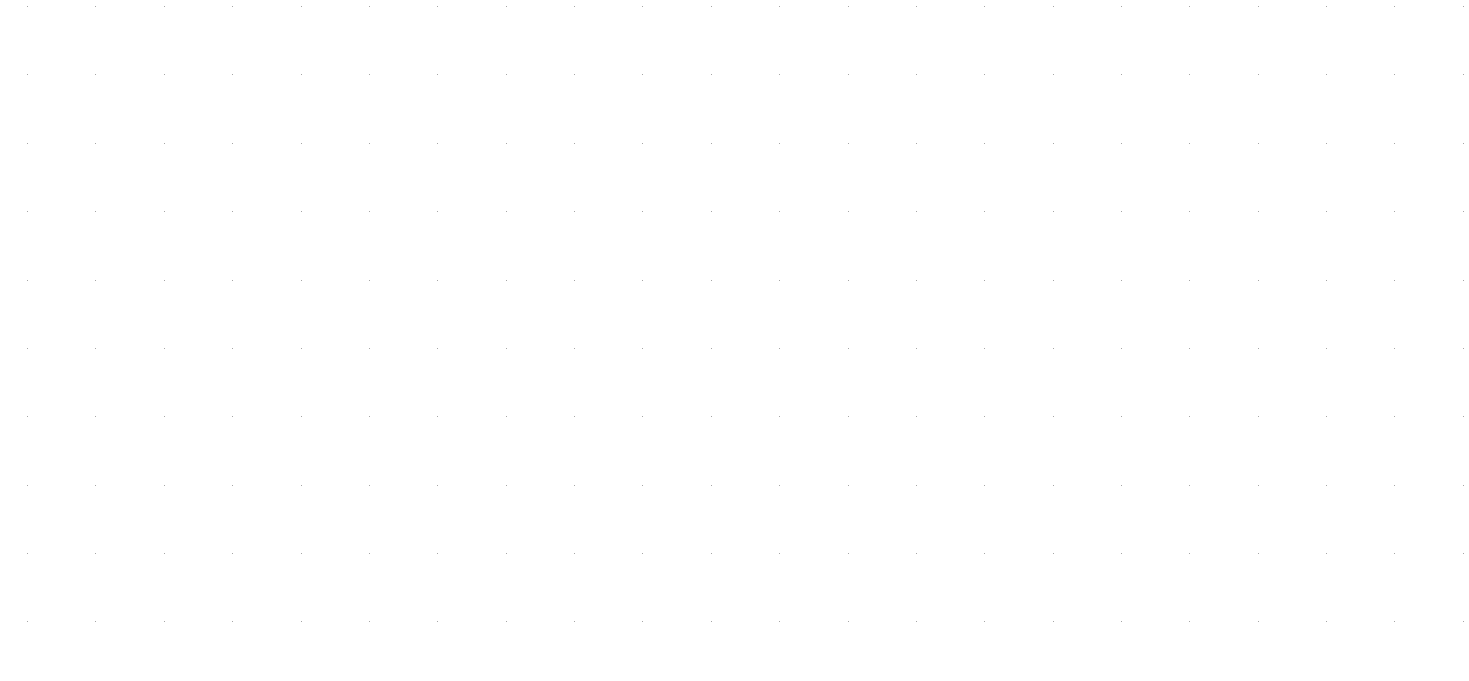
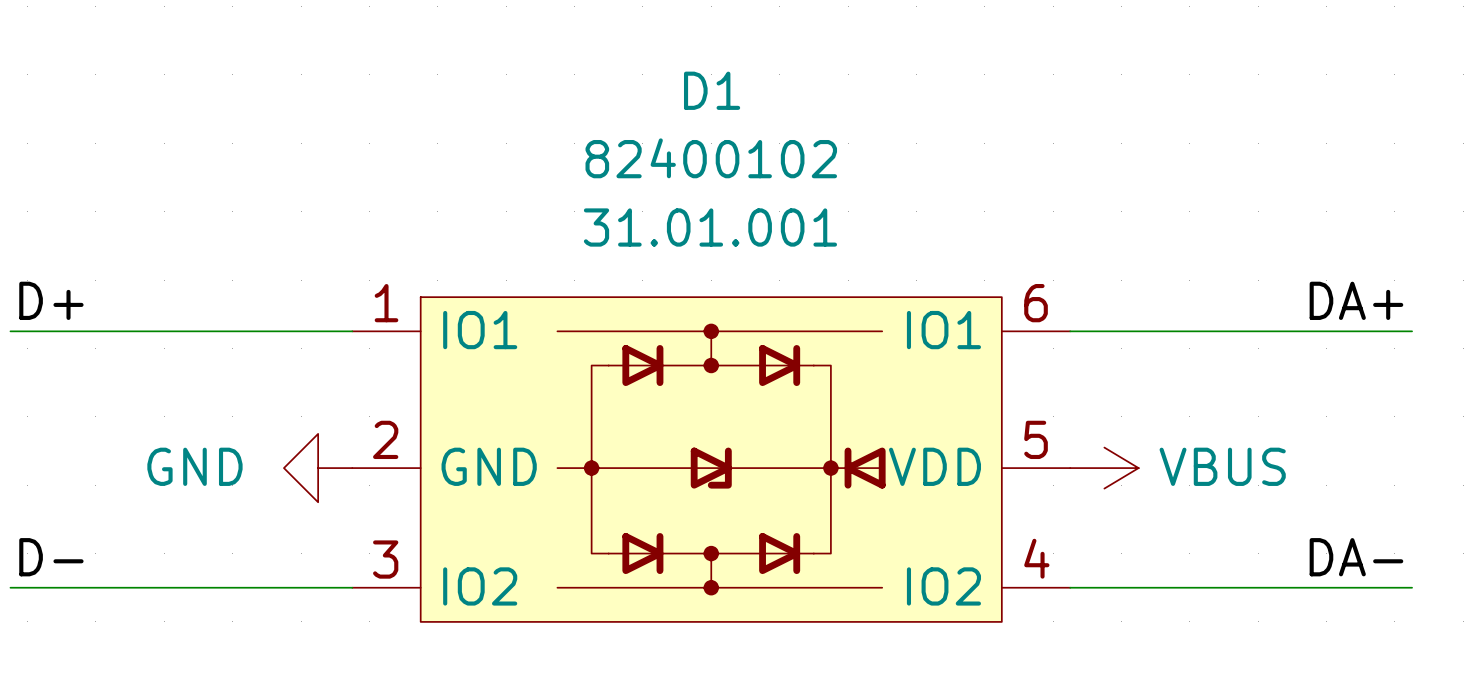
label: none -> D+ (51, 300)
label: none -> DA+ (1356, 300)
wire: none -> (10, 331) (352, 331)
wire: none -> (1070, 331) (1412, 331)
D1: none -> 82400102 (711, 459)
power symbol: none -> GND (318, 468)
power symbol: none -> VBUS (1104, 468)
label: none -> D- (51, 557)
label: none -> DA- (1356, 557)
wire: none -> (10, 587) (352, 587)
wire: none -> (1070, 587) (1412, 587)

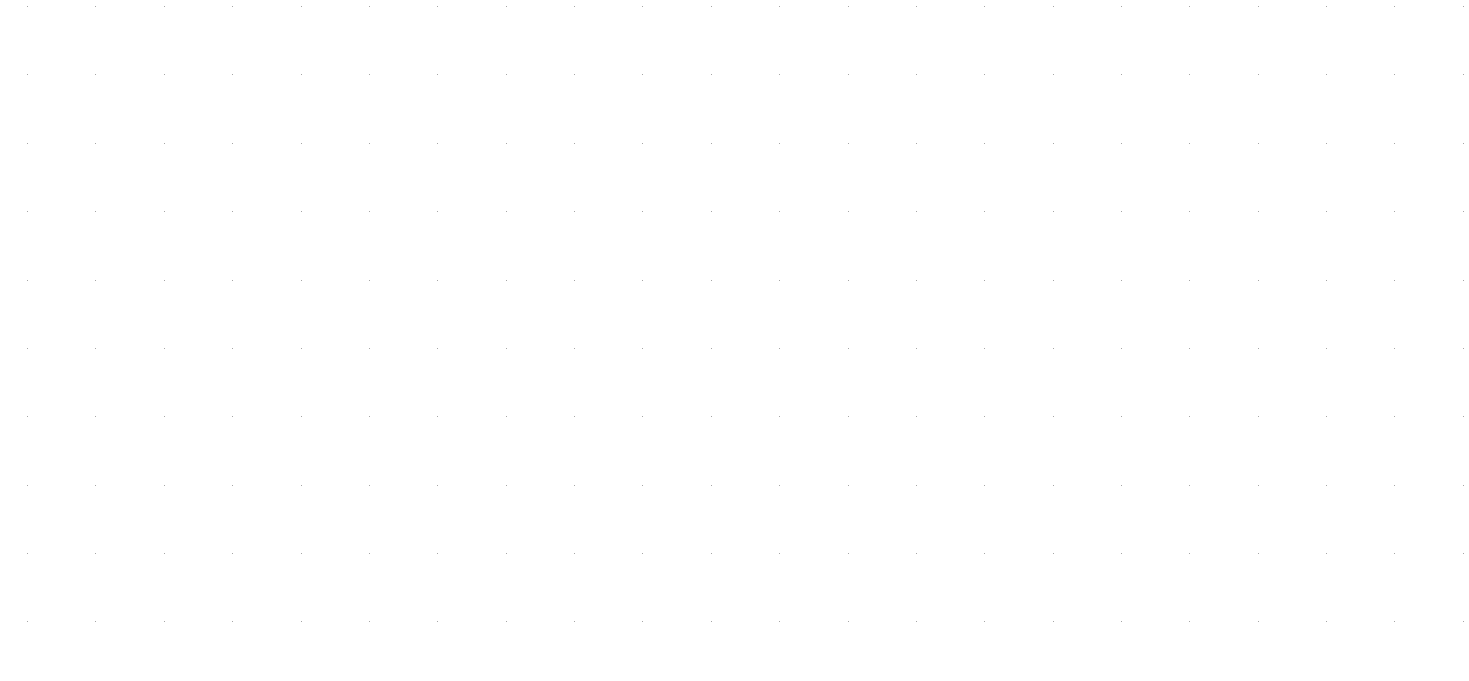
label: D+ (51, 300) -> none
label: DA+ (1356, 300) -> none
wire: (10, 331) (352, 331) -> none
wire: (1070, 331) (1412, 331) -> none
D1: 82400102 (711, 459) -> none
power symbol: GND (318, 468) -> none
power symbol: VBUS (1104, 468) -> none
label: D- (51, 557) -> none
label: DA- (1356, 557) -> none
wire: (10, 587) (352, 587) -> none
wire: (1070, 587) (1412, 587) -> none

